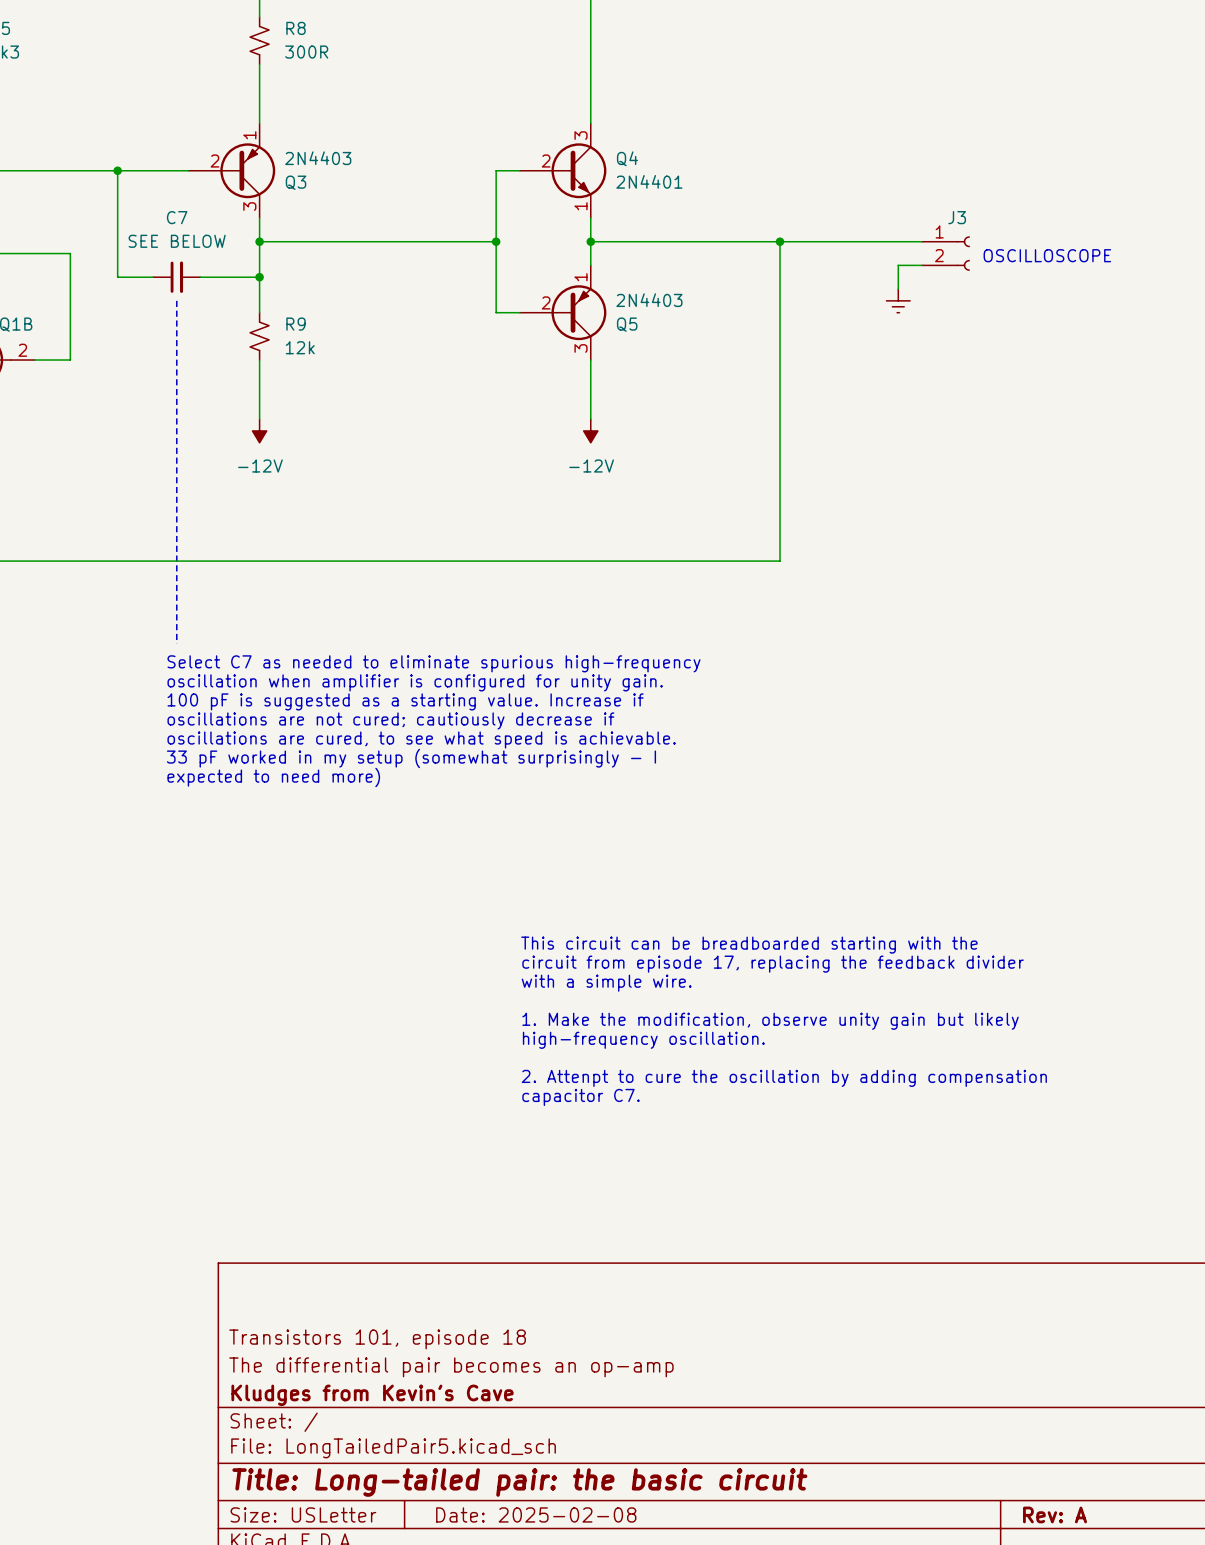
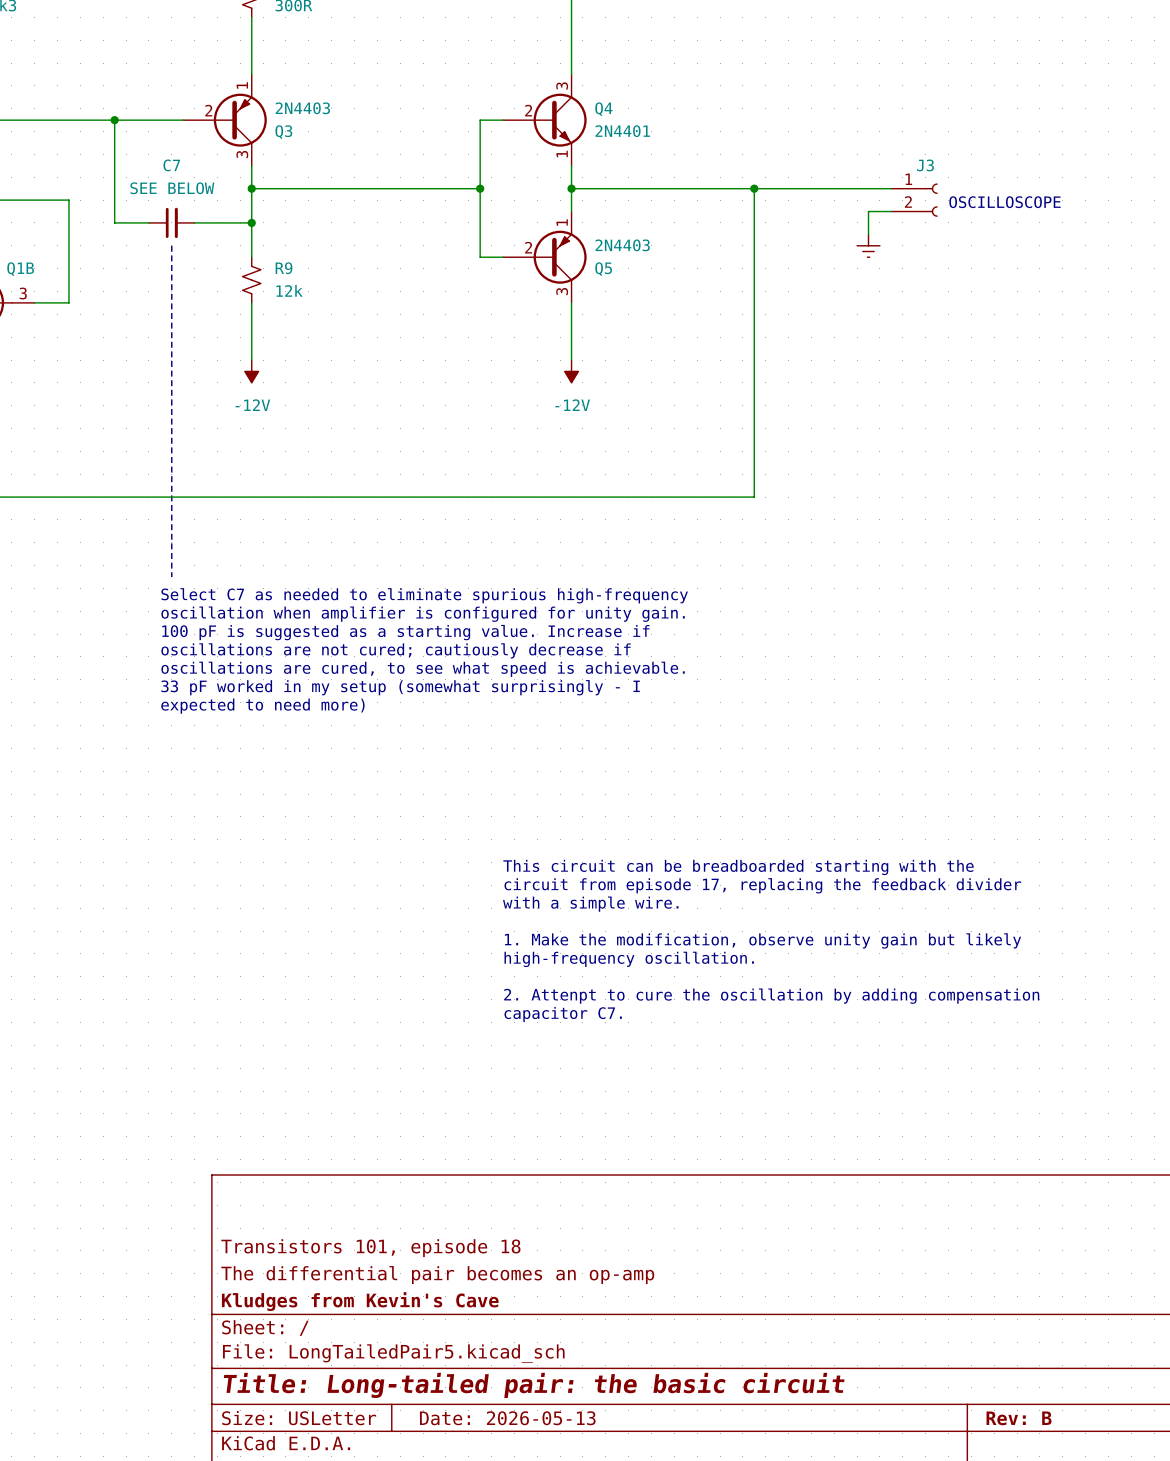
Q1B pin number: 2 (22, 350) -> 3 (23, 293)
title block: Date: 2025-02-08 (536, 1514) -> Date: 2026-05-13 (507, 1418)
title block: Rev: A (1055, 1514) -> Rev: B (1019, 1418)

